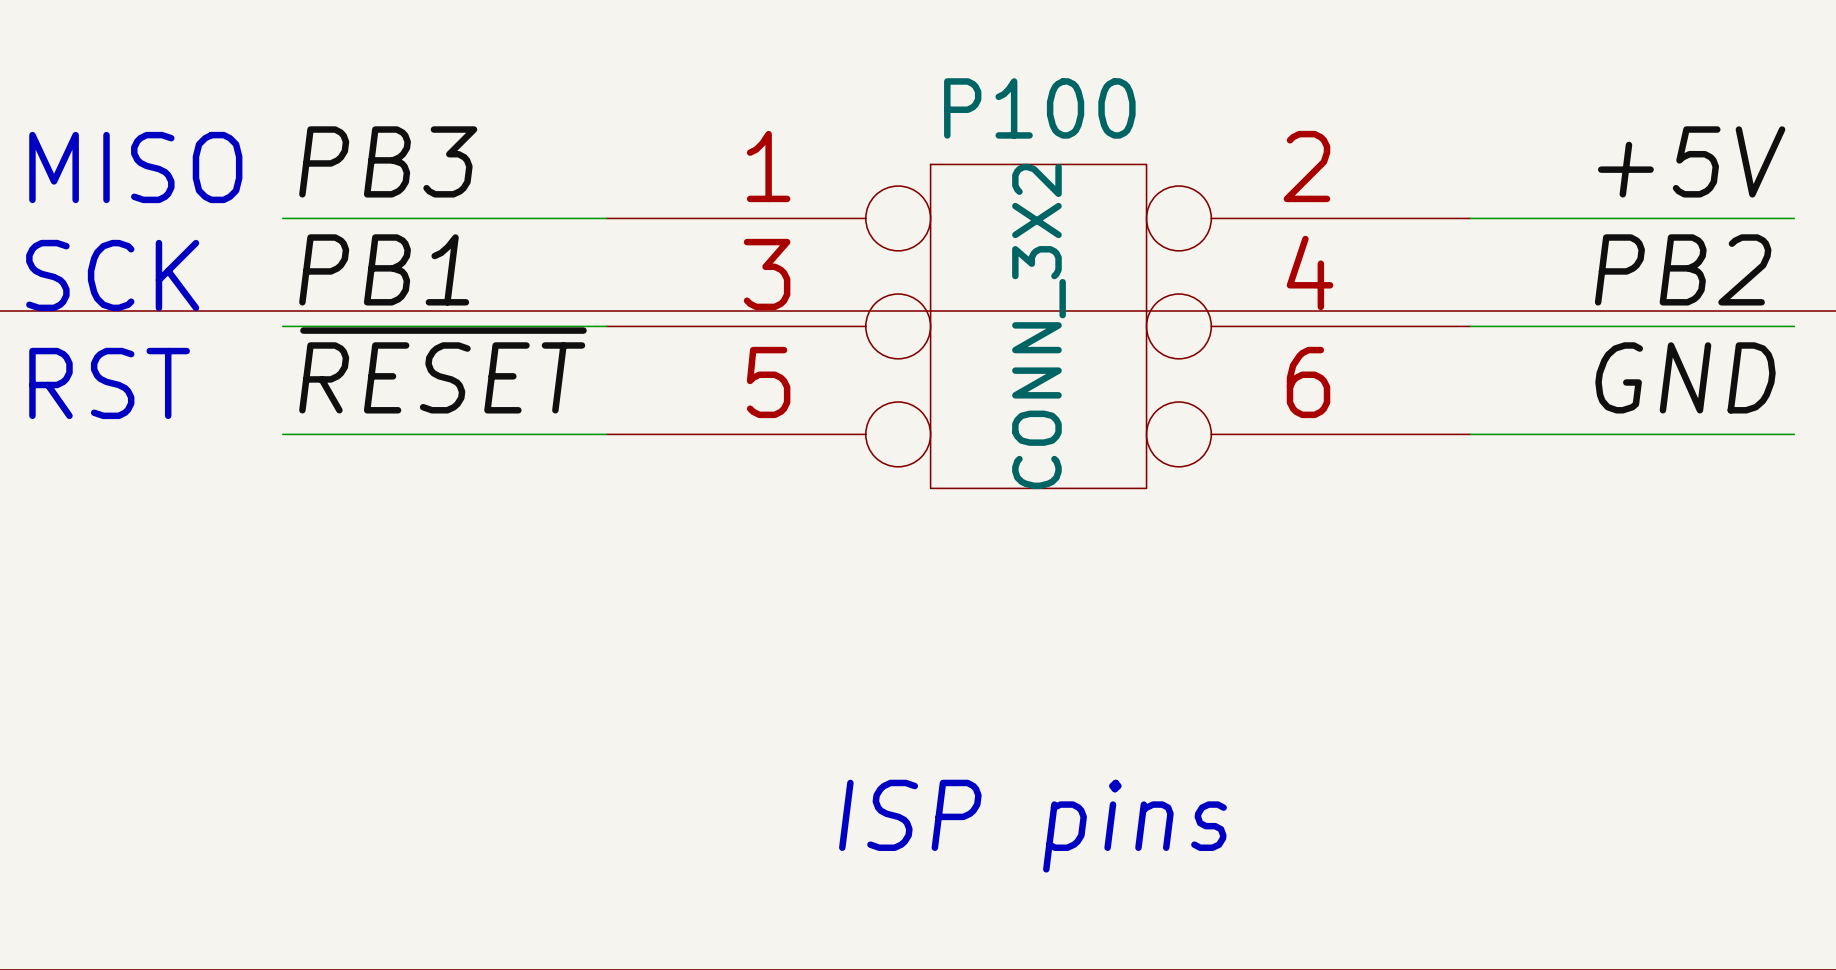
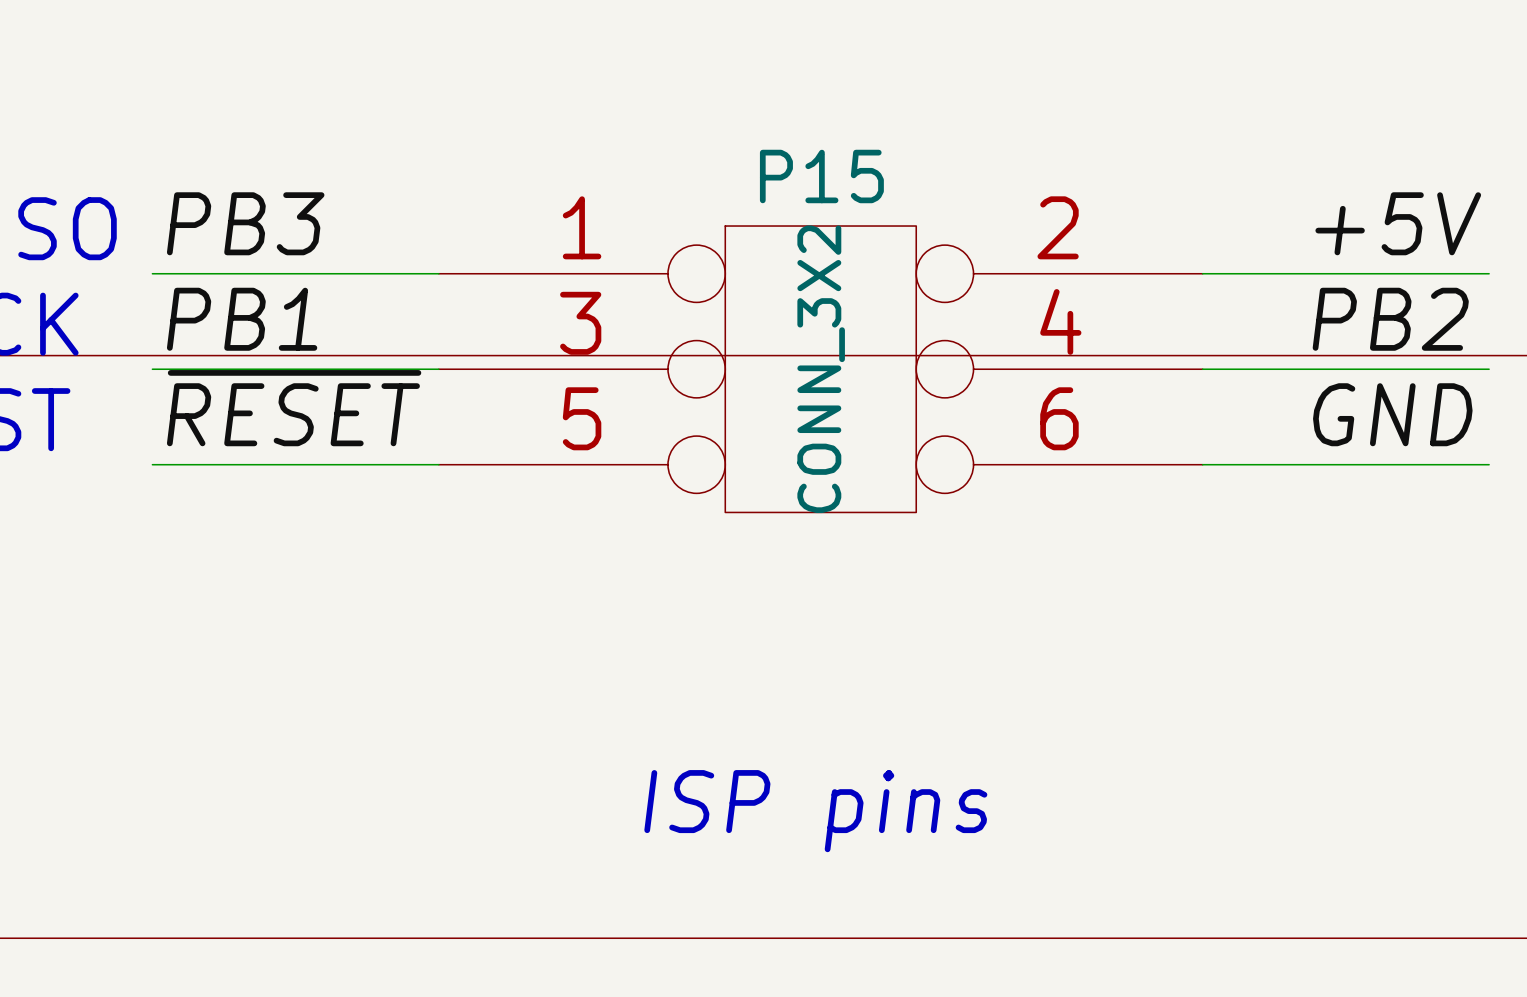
P100 name: P100 (1039, 108) -> P15 (821, 176)

